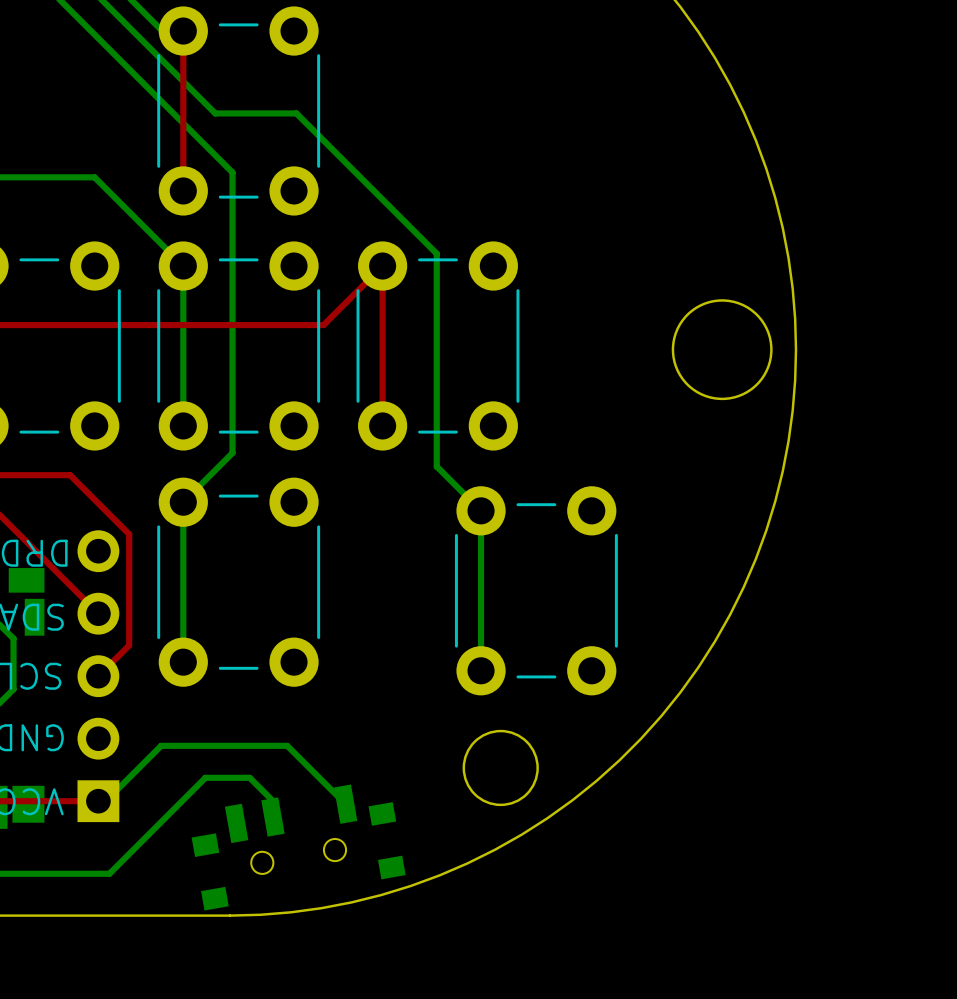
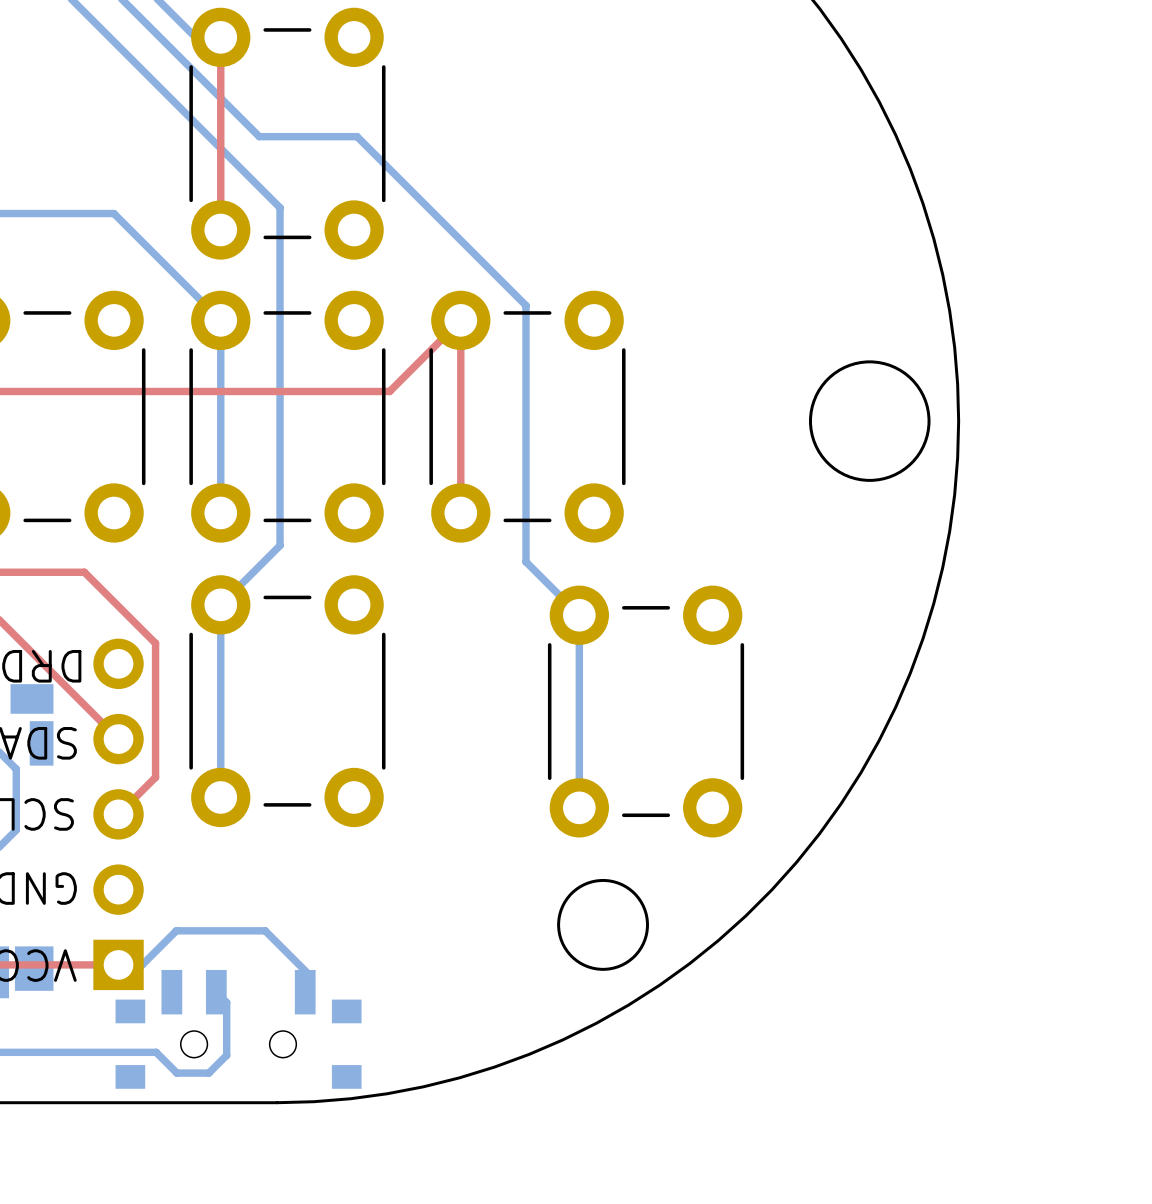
bottom track: (98, 801) (105, 801) (161, 745) (287, 745) (345, 804) -> (117, 965) (141, 965) (176, 930) (265, 930) (305, 970) (305, 992)
bottom track: (272, 817) (272, 801) (249, 777) (205, 777) (109, 873) -> (216, 992) (226, 1002) (226, 1055) (208, 1073) (176, 1073) (156, 1052) (131, 1052)
part: (298, 847) -> none
part: none -> (238, 1029)

